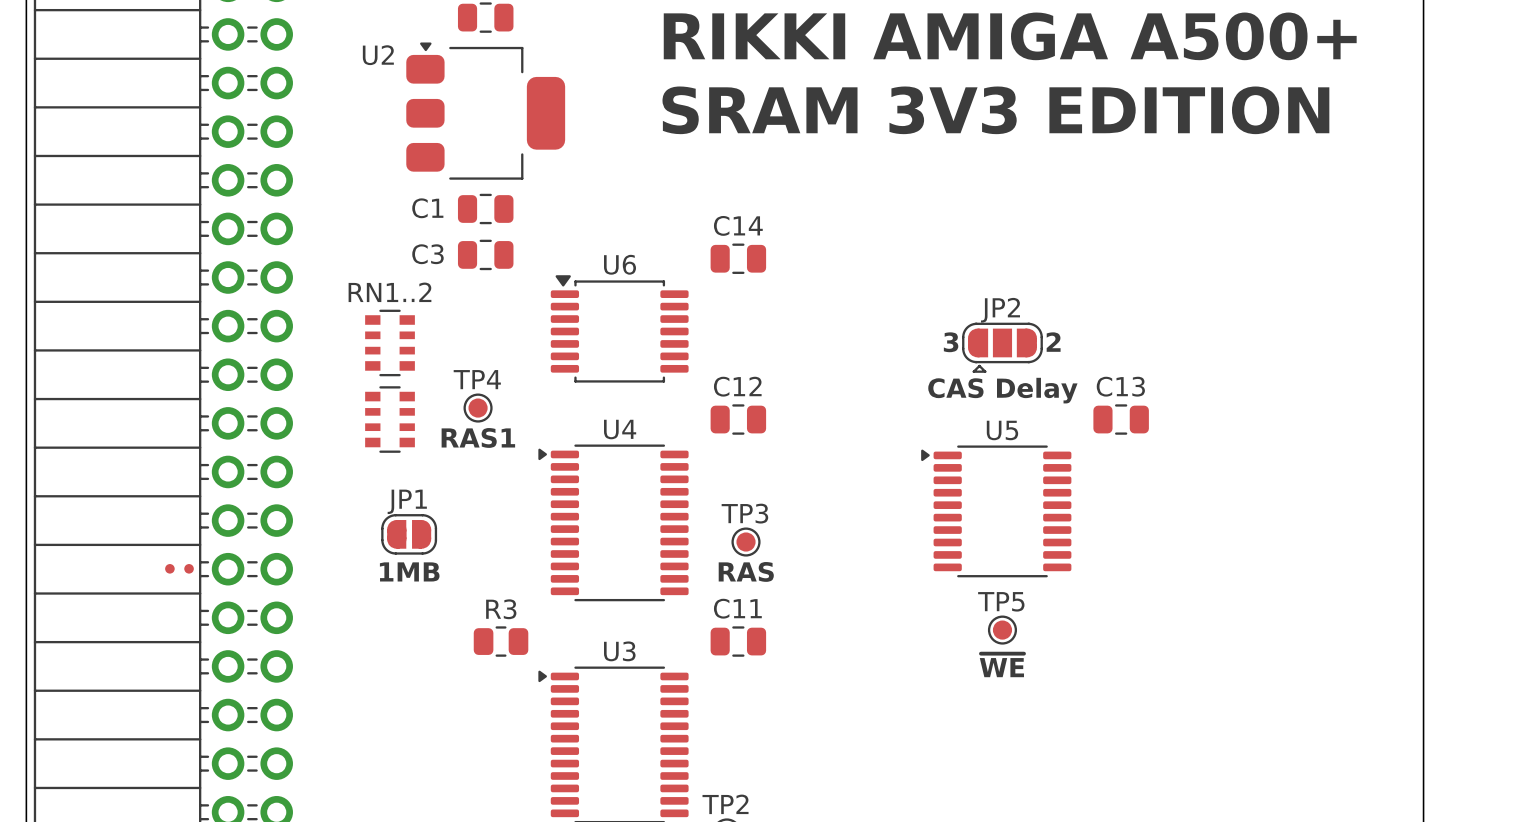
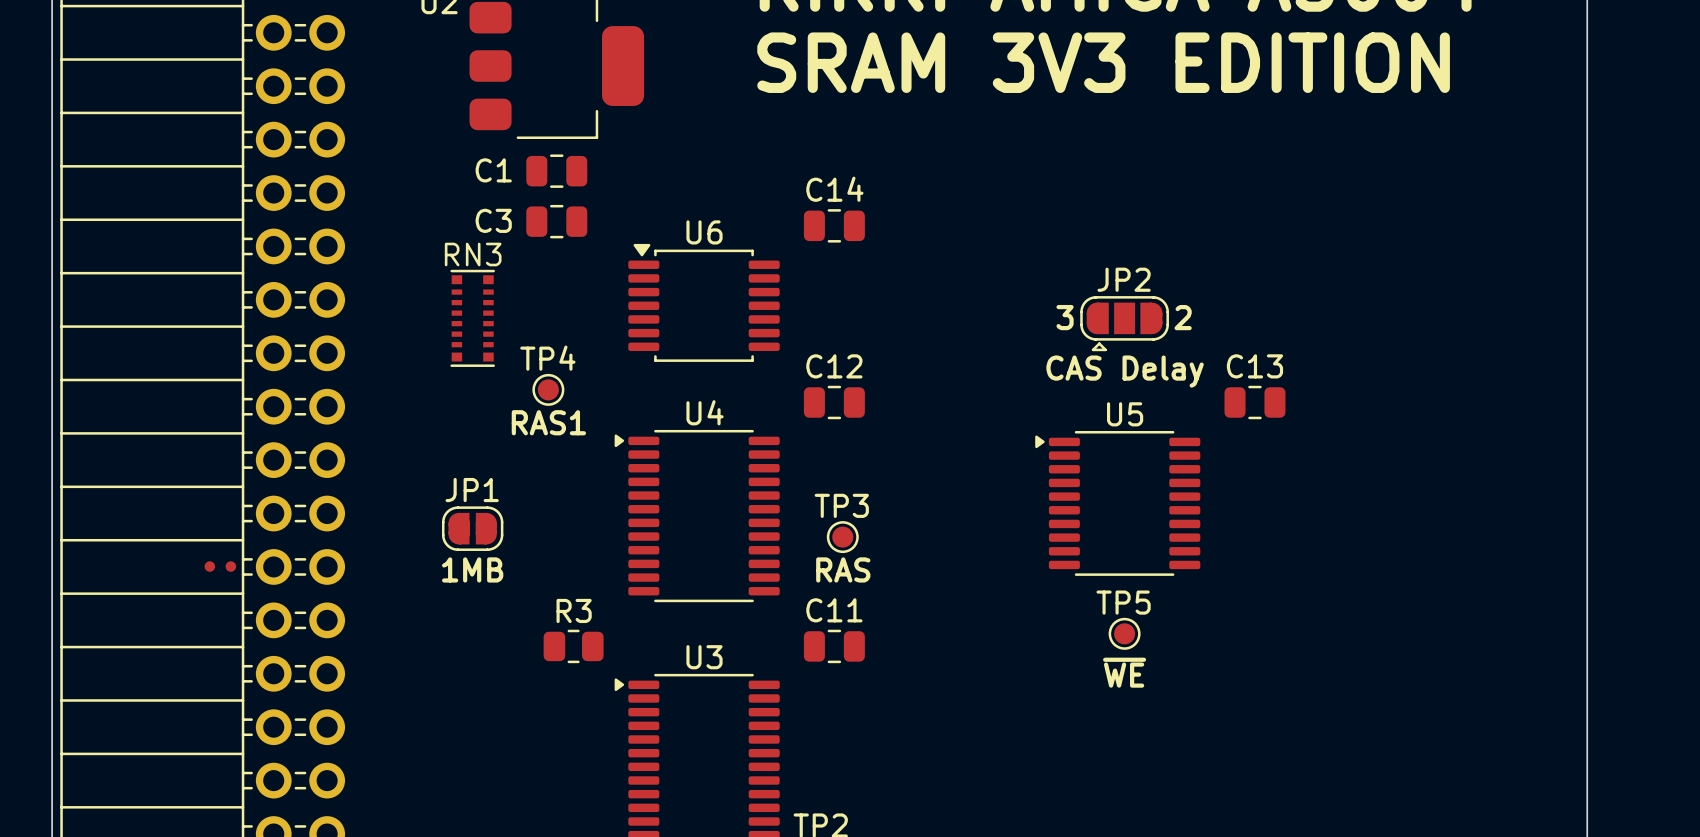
RN1..2: (390, 342) -> none
RN3: none -> (472, 318)
part: (390, 419) -> none

